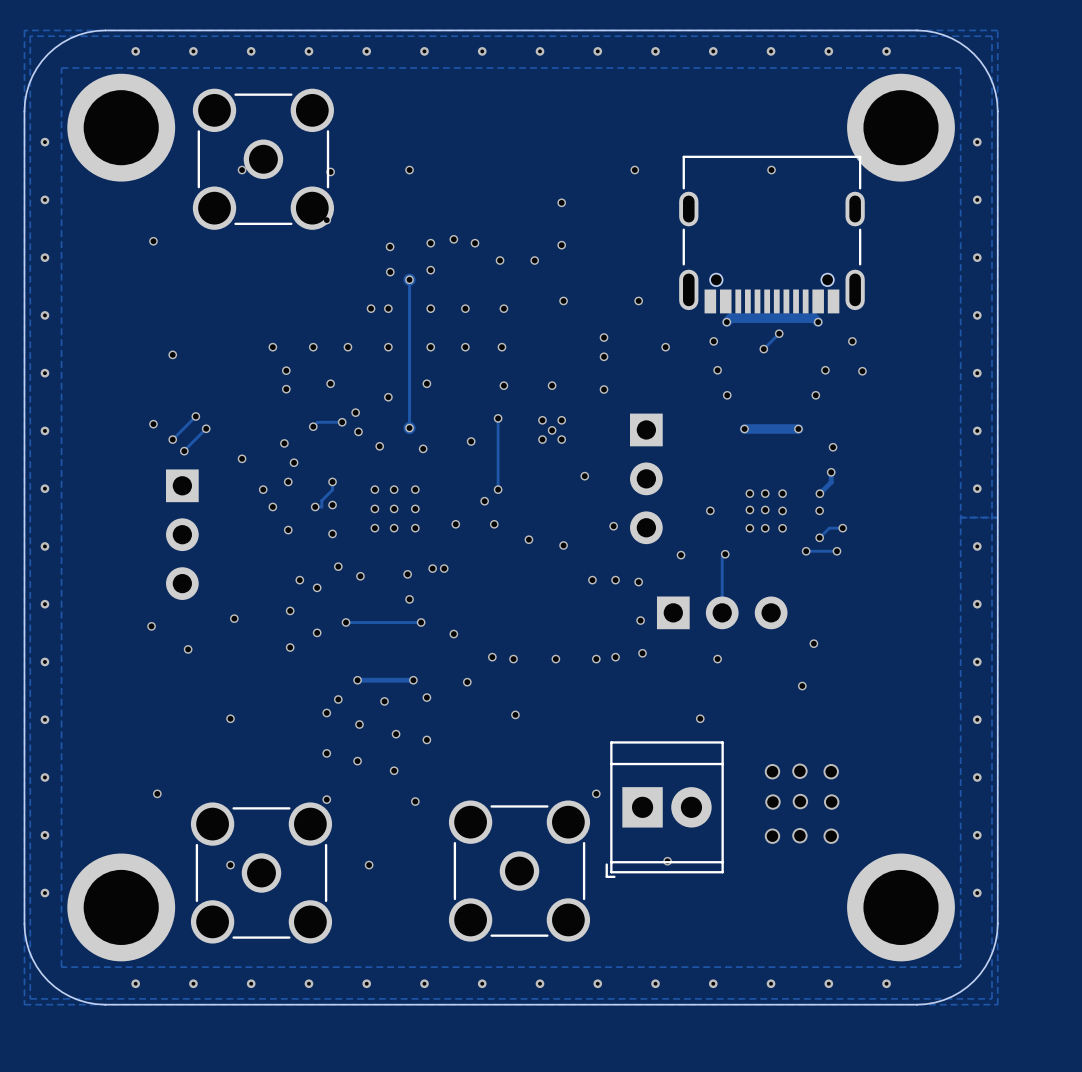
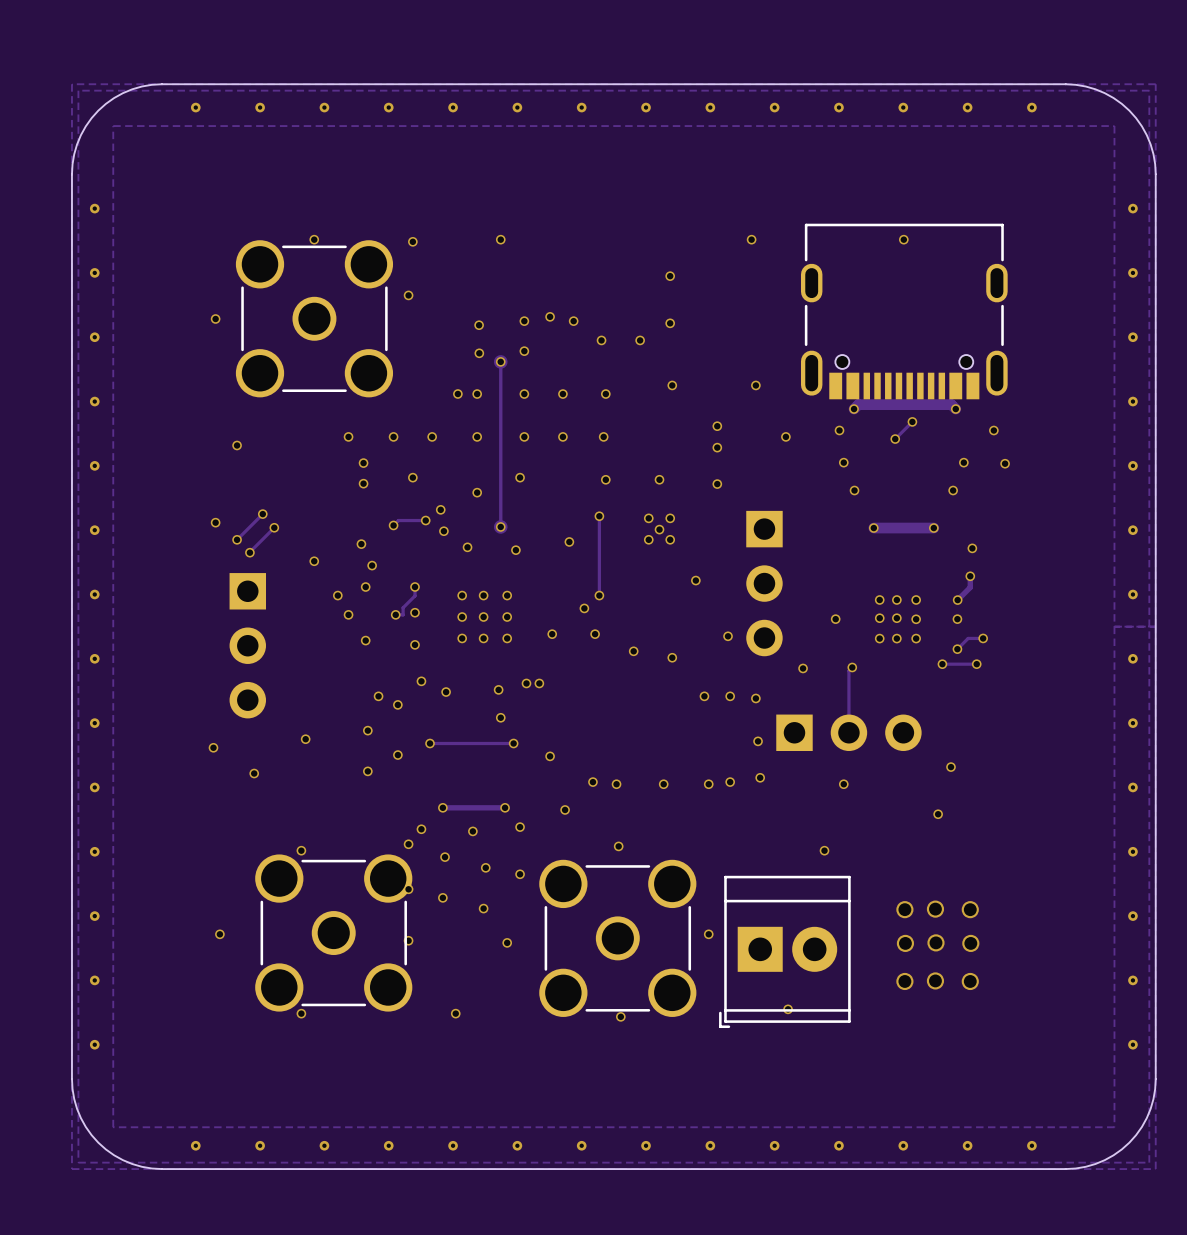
part: (121, 127) -> none
part: (901, 127) -> none
part position: (263, 159) -> (314, 318)
via: none -> (620, 1016)
part position: (519, 871) -> (617, 938)
part position: (261, 872) -> (333, 933)
part: (121, 907) -> none
part: (901, 907) -> none

